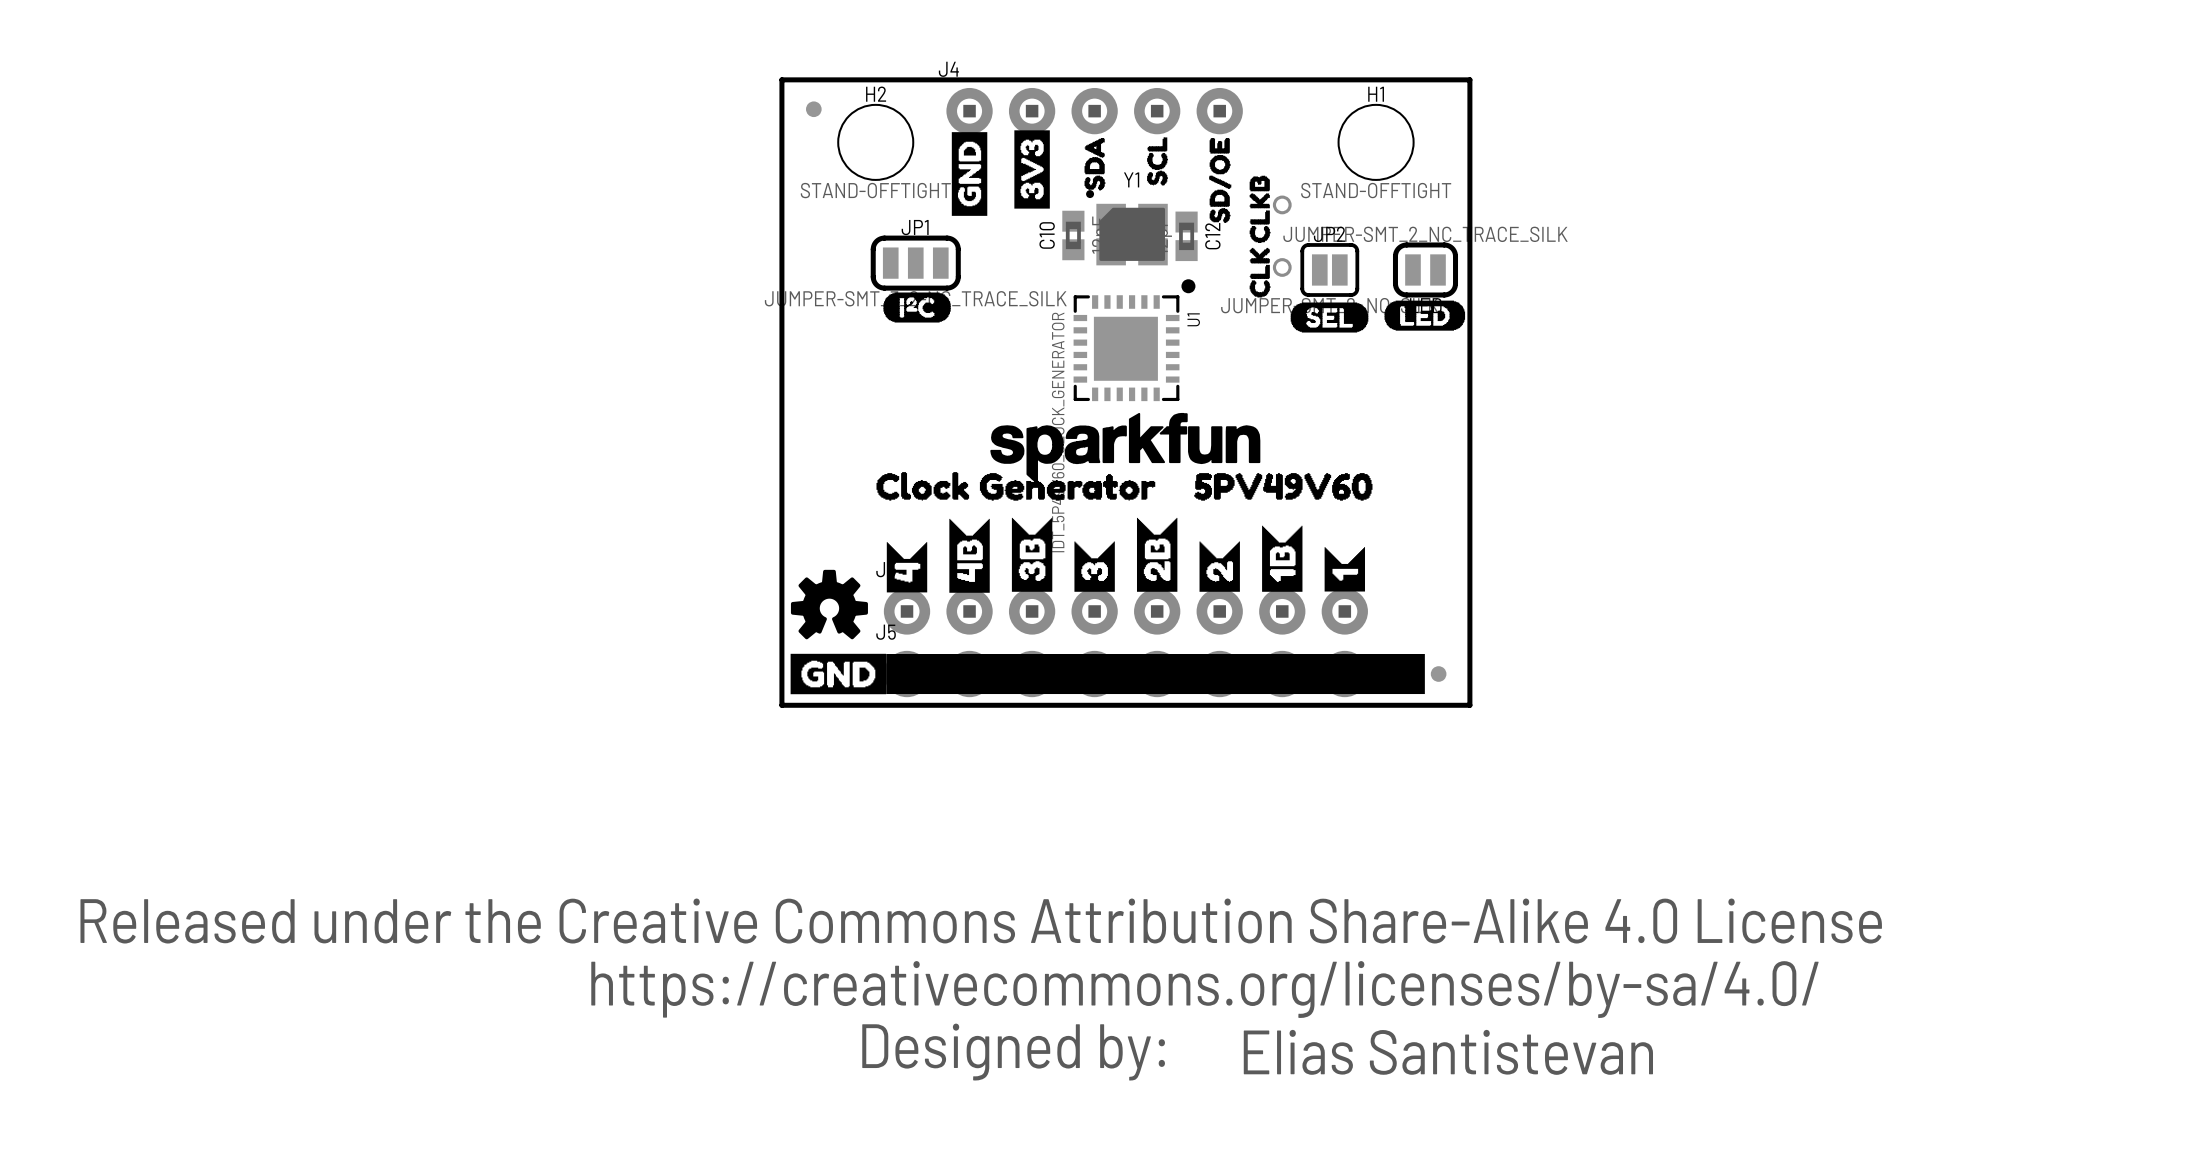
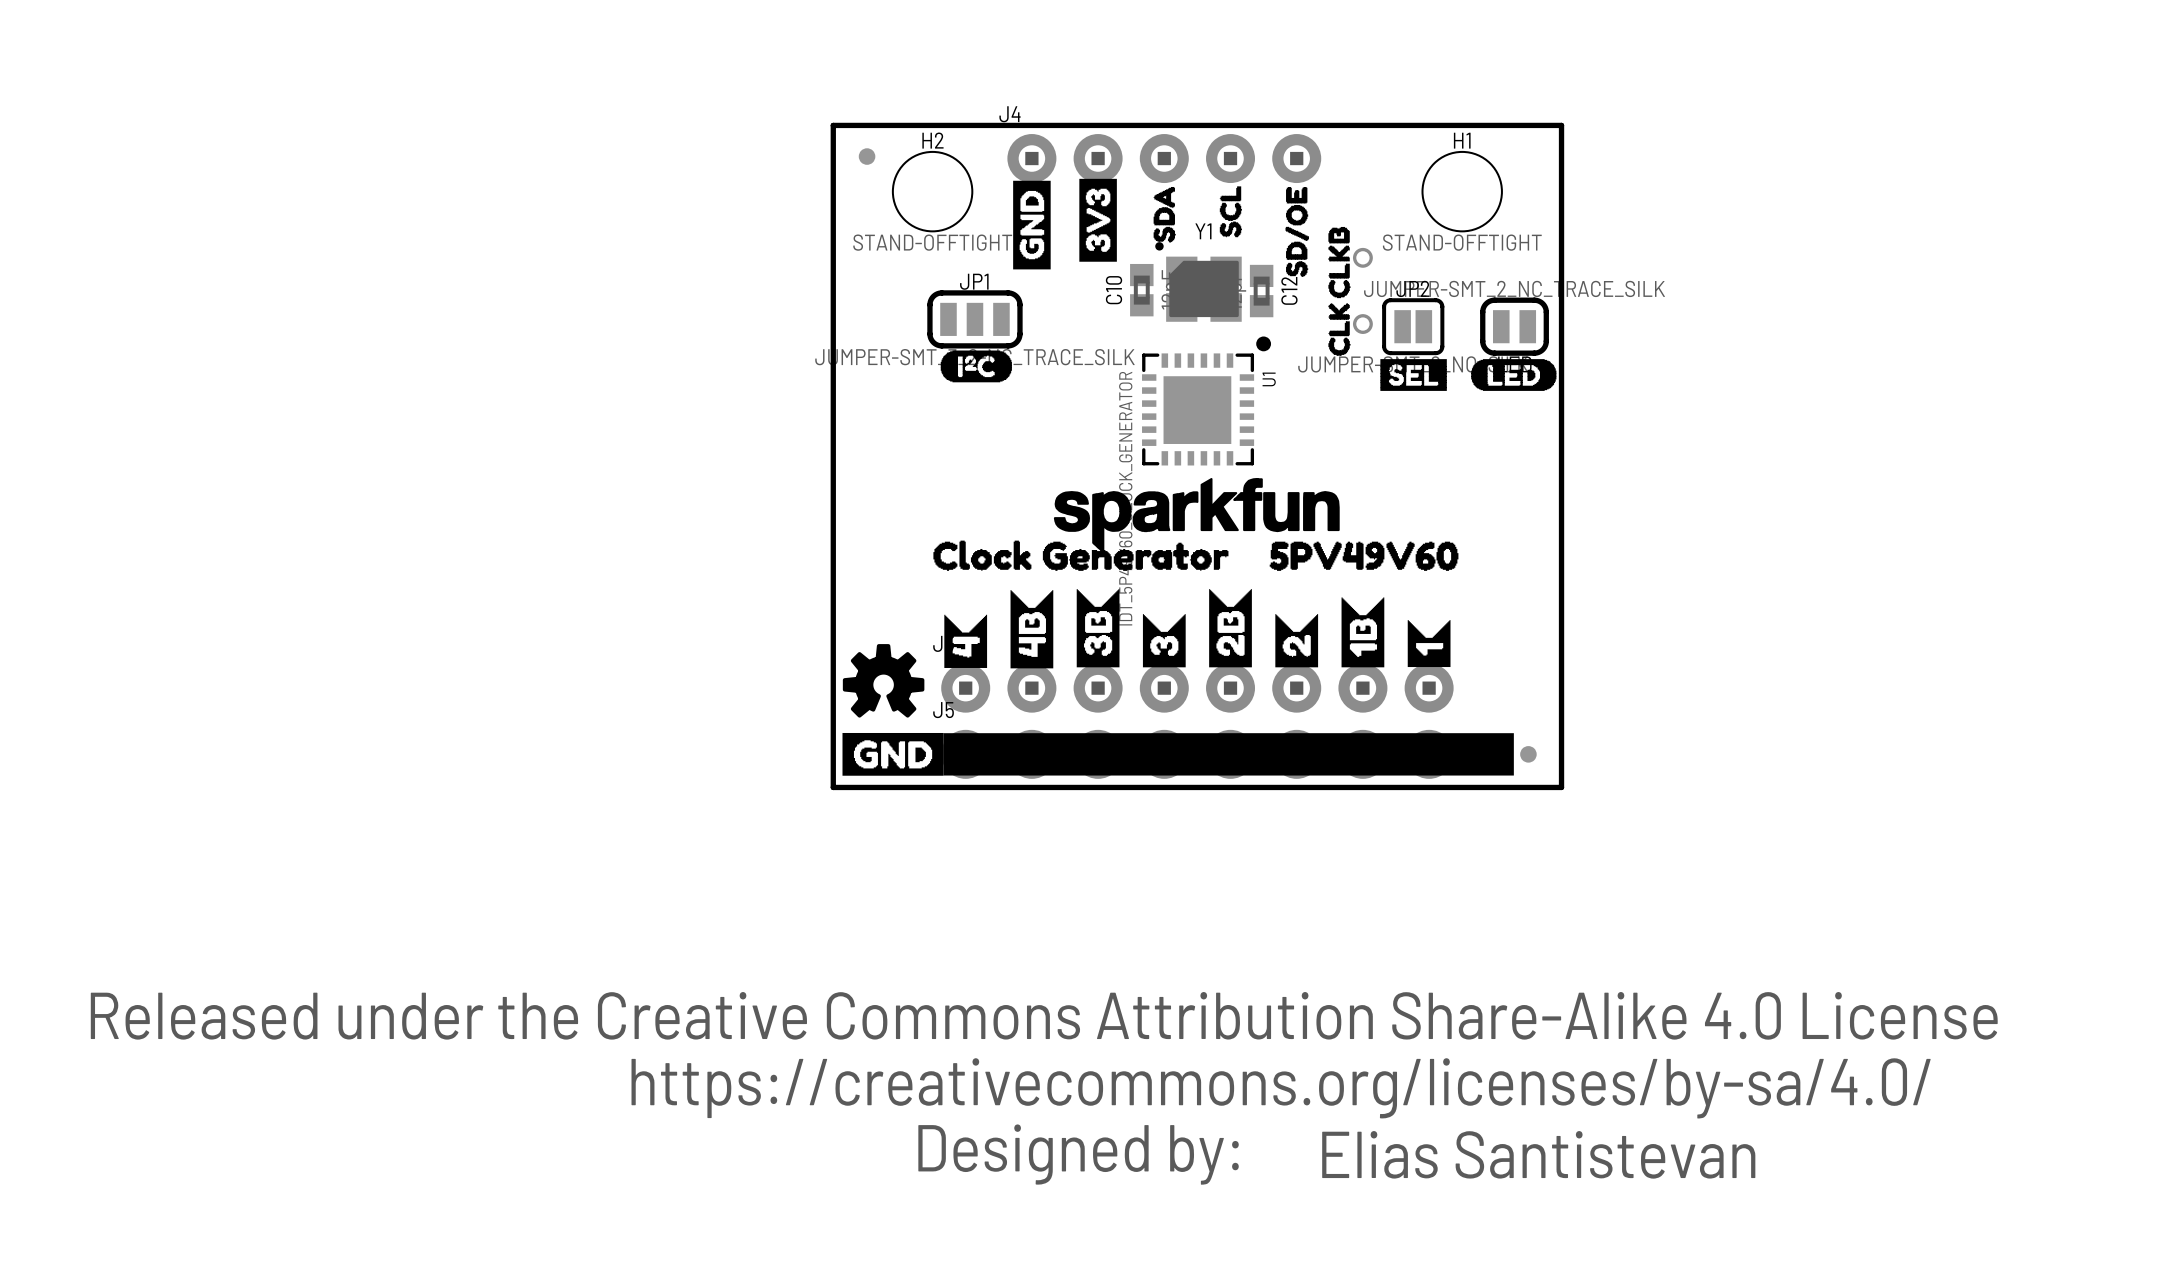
drawing shape: [1290, 302, 1369, 333] -> [1380, 359, 1447, 391]

